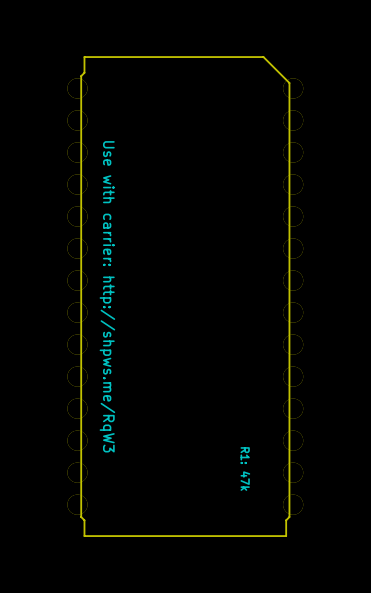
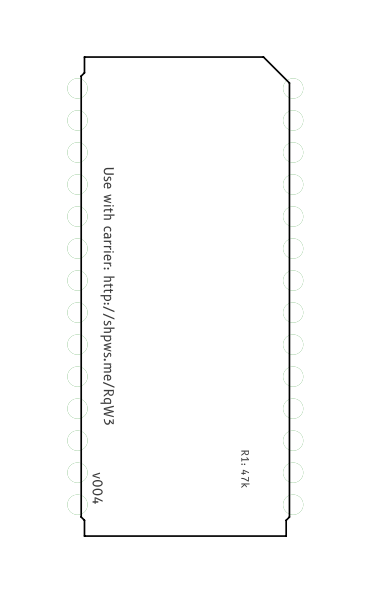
text: none -> v004 (97, 488)

